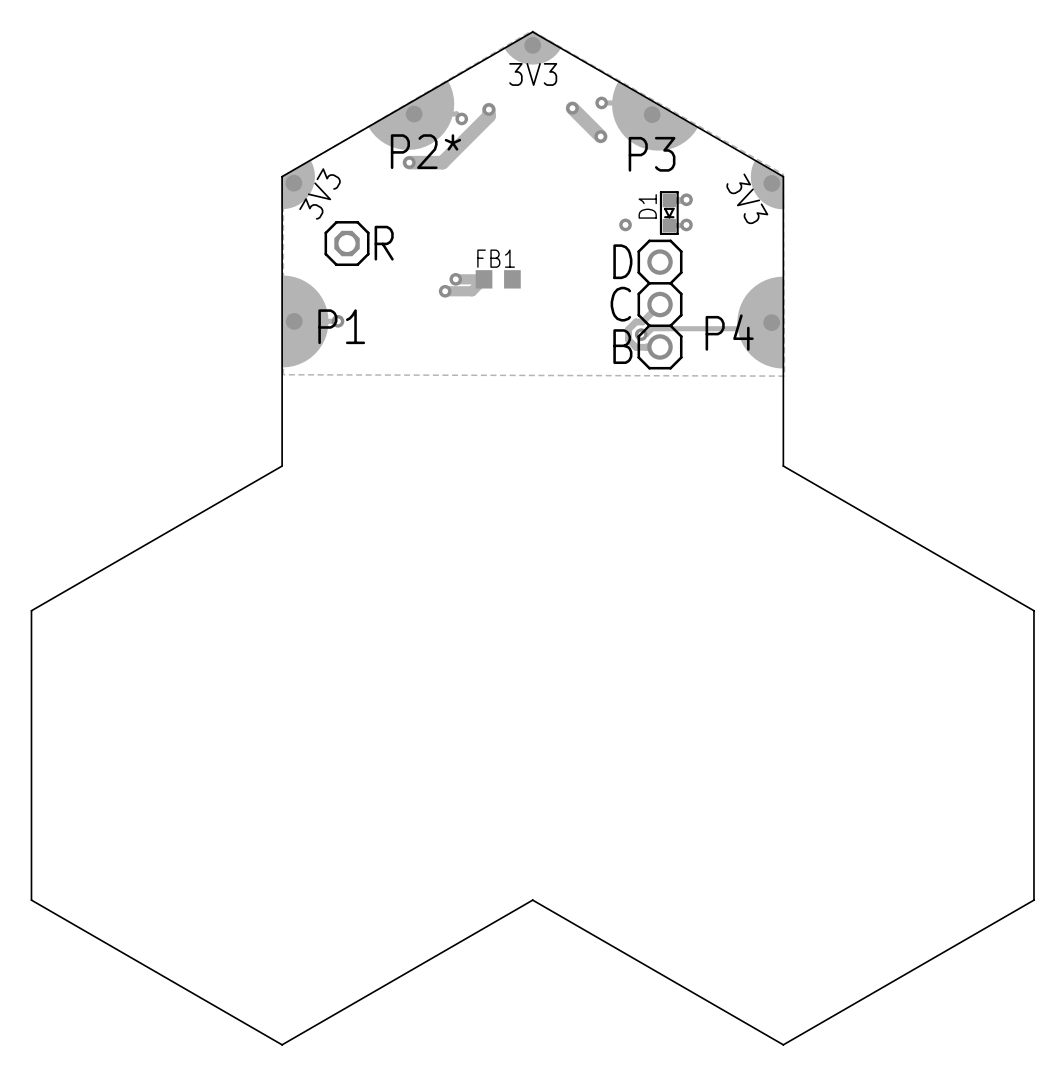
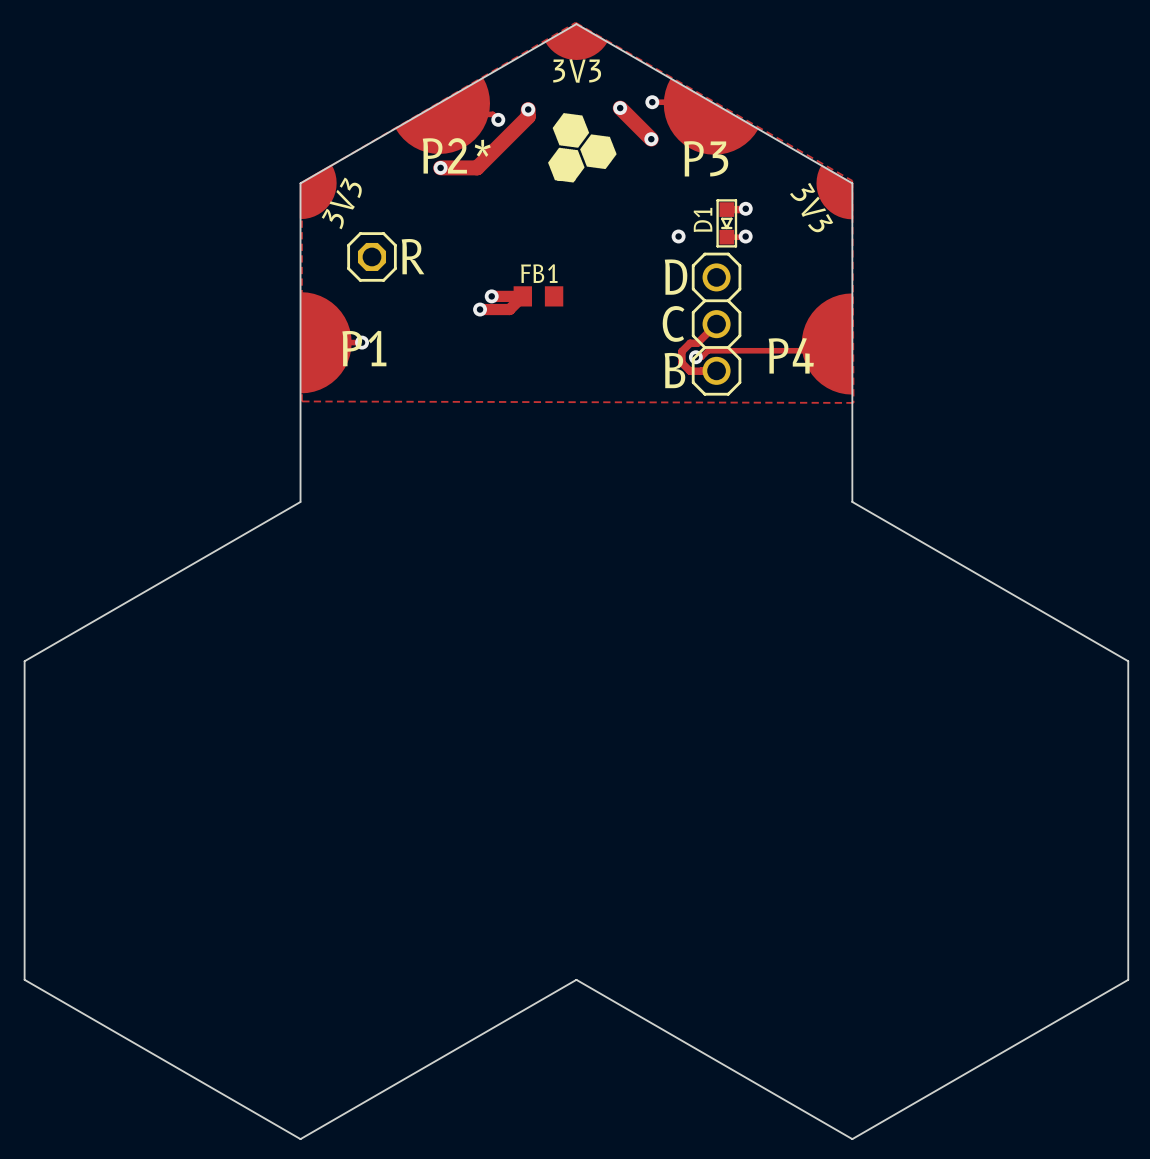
drawing: none -> [548, 113, 617, 183]

